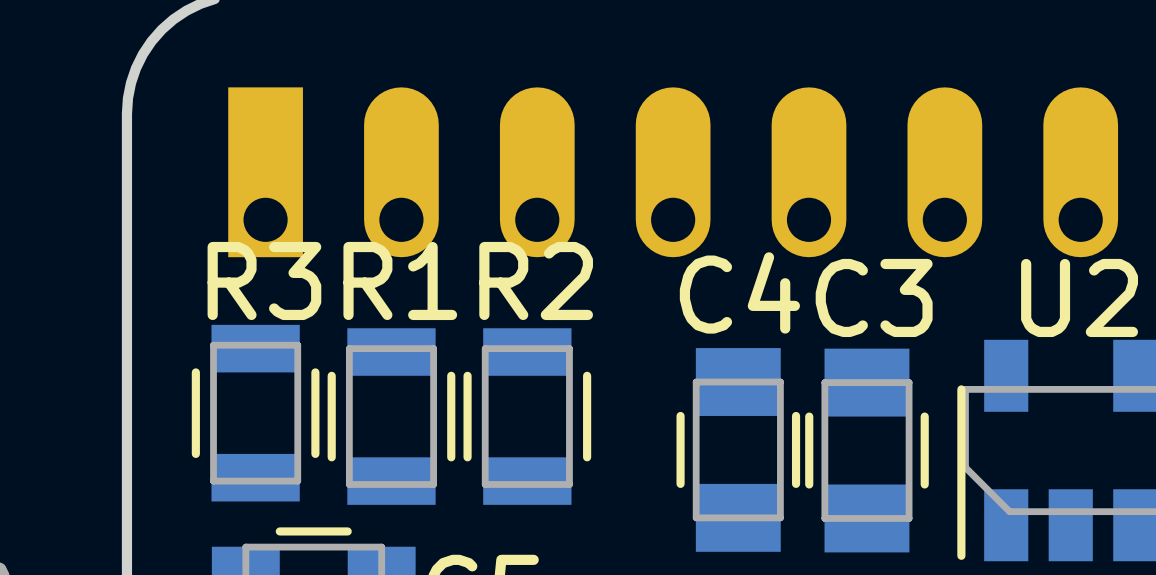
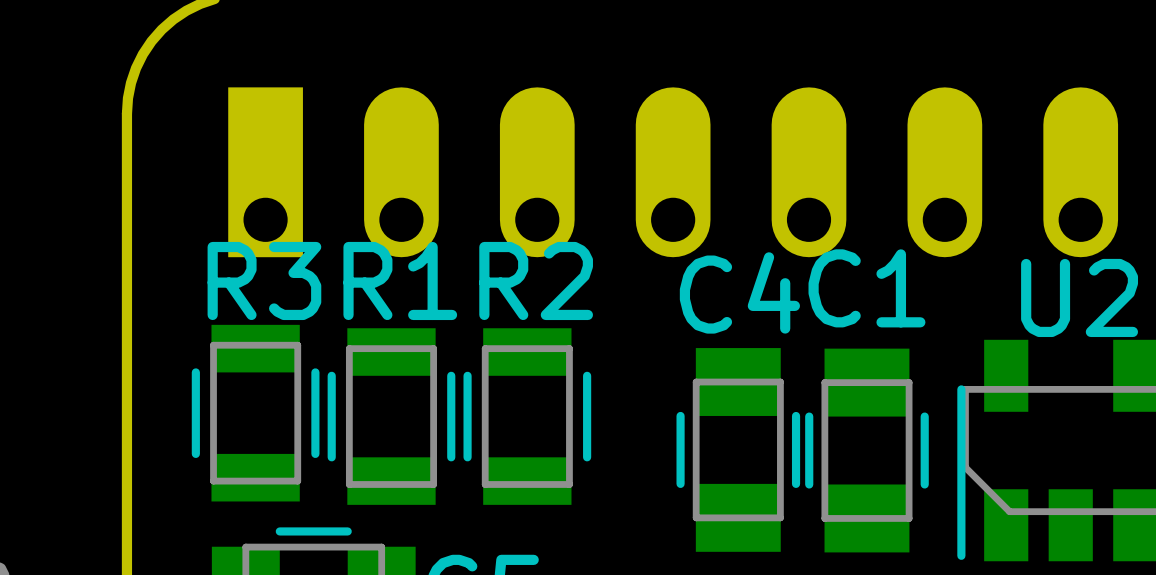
C3 name: C3 (874, 297) -> C1 (866, 288)

